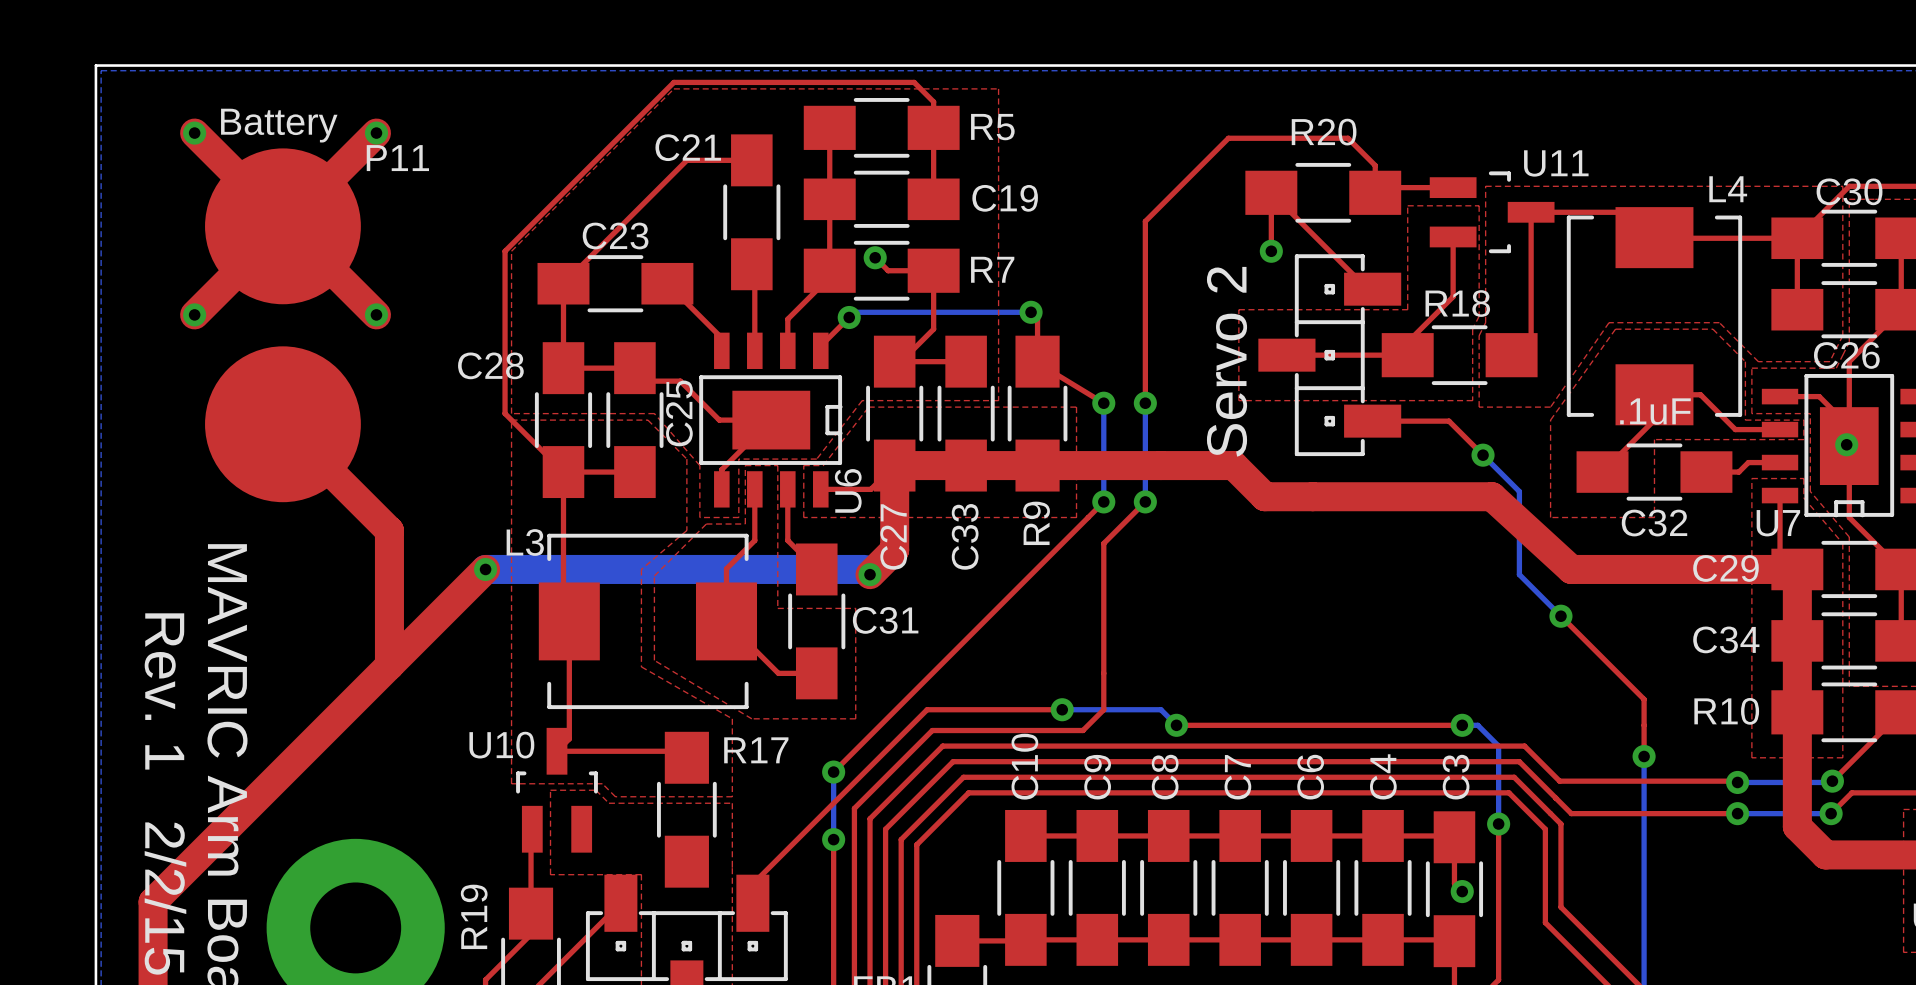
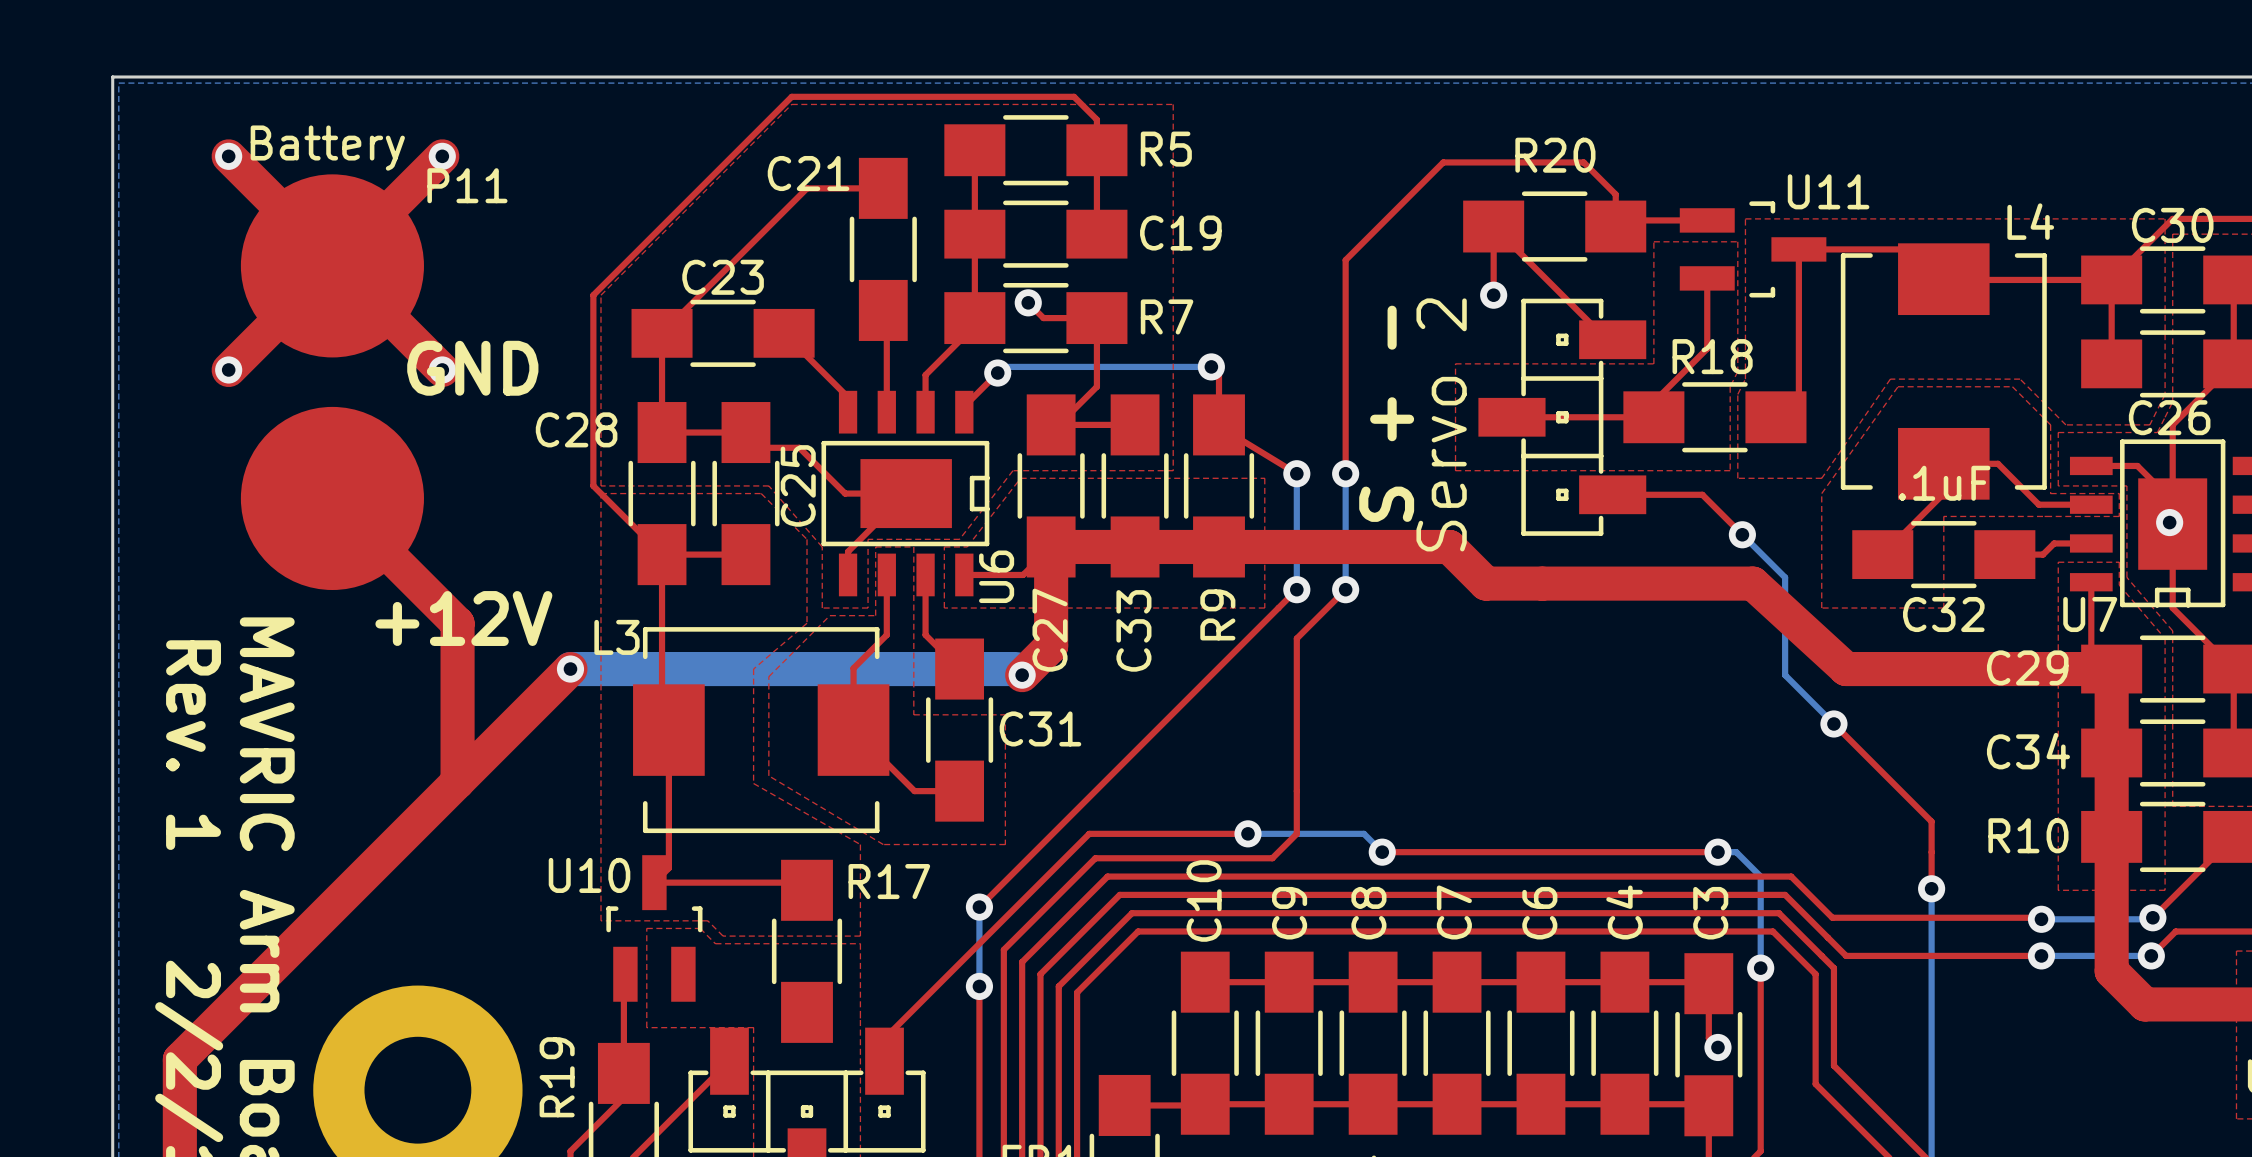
text: none -> GND (472, 368)
text: none -> S + - (1386, 413)
text: none -> +12V (463, 618)

